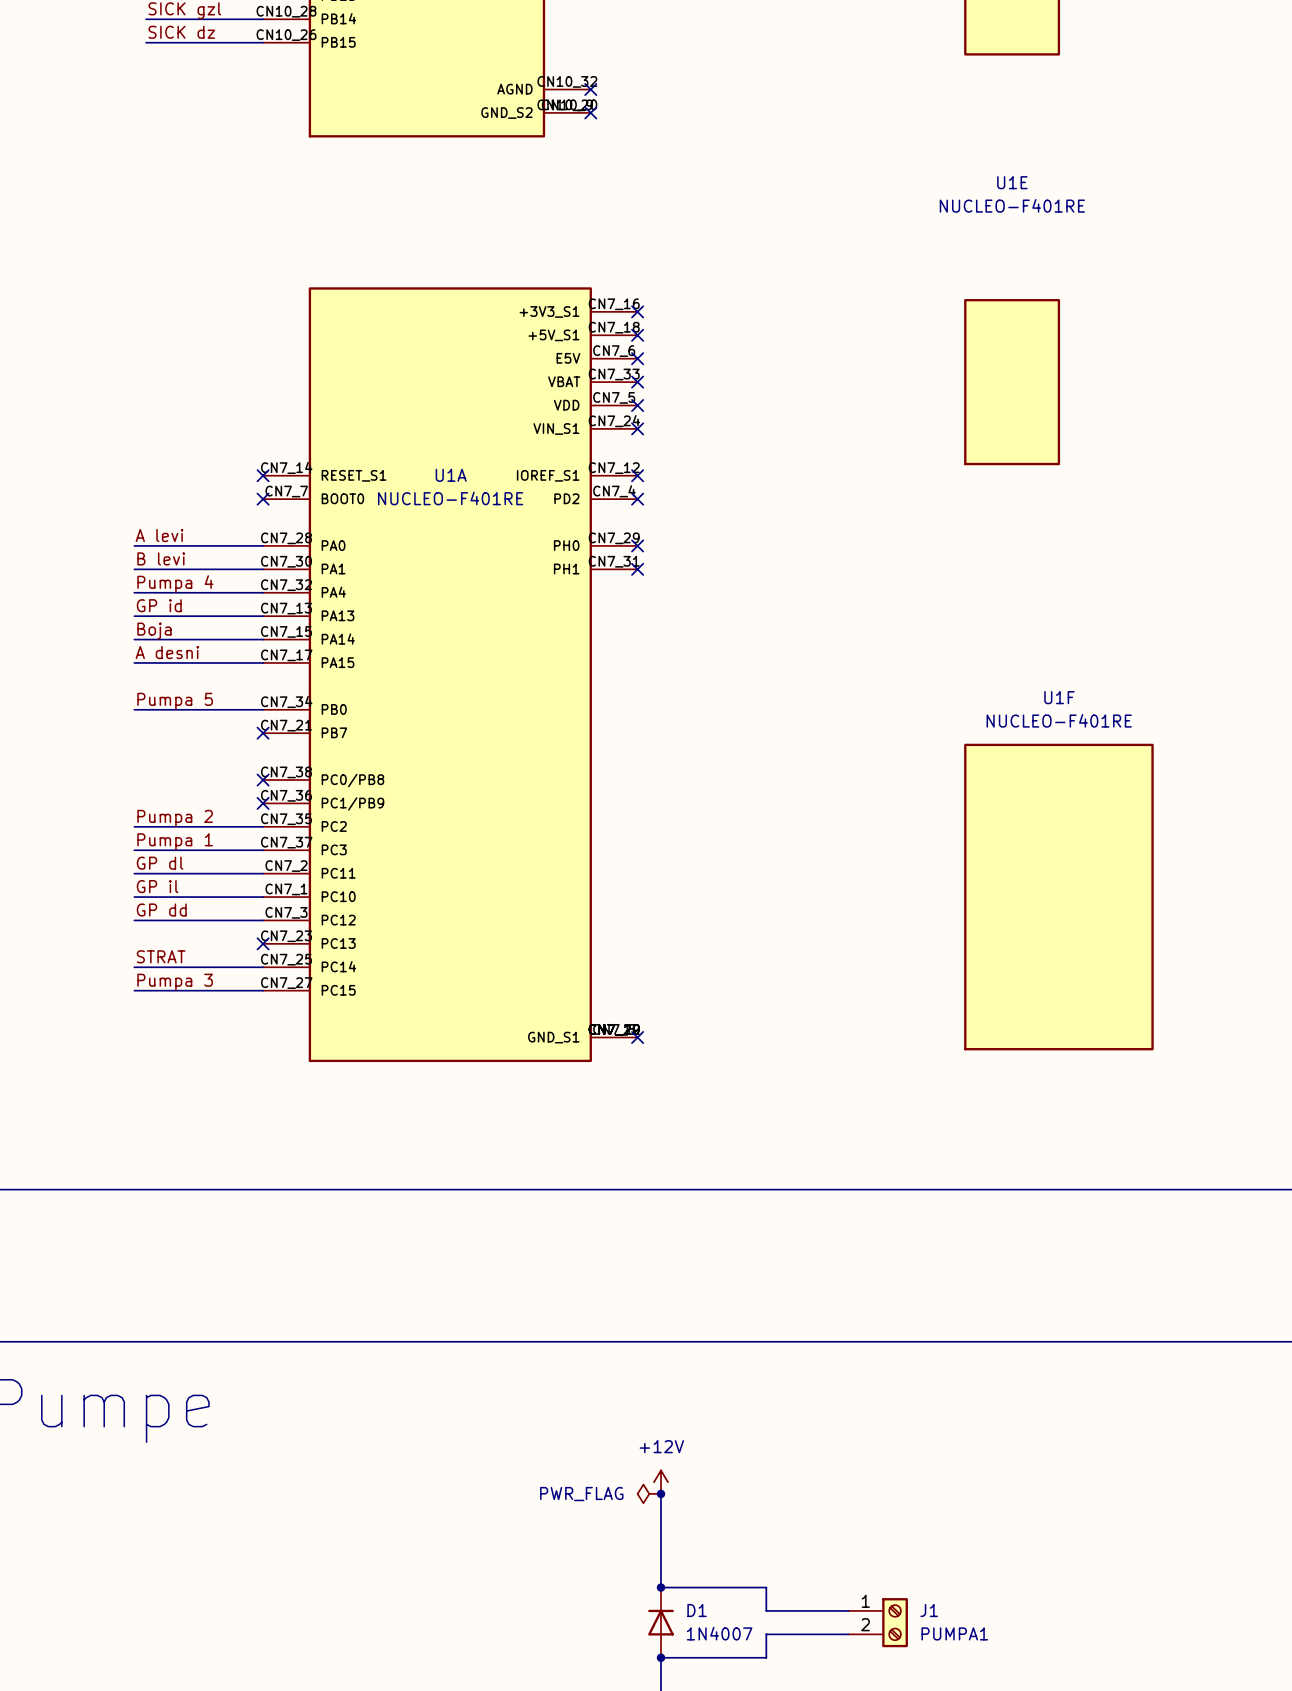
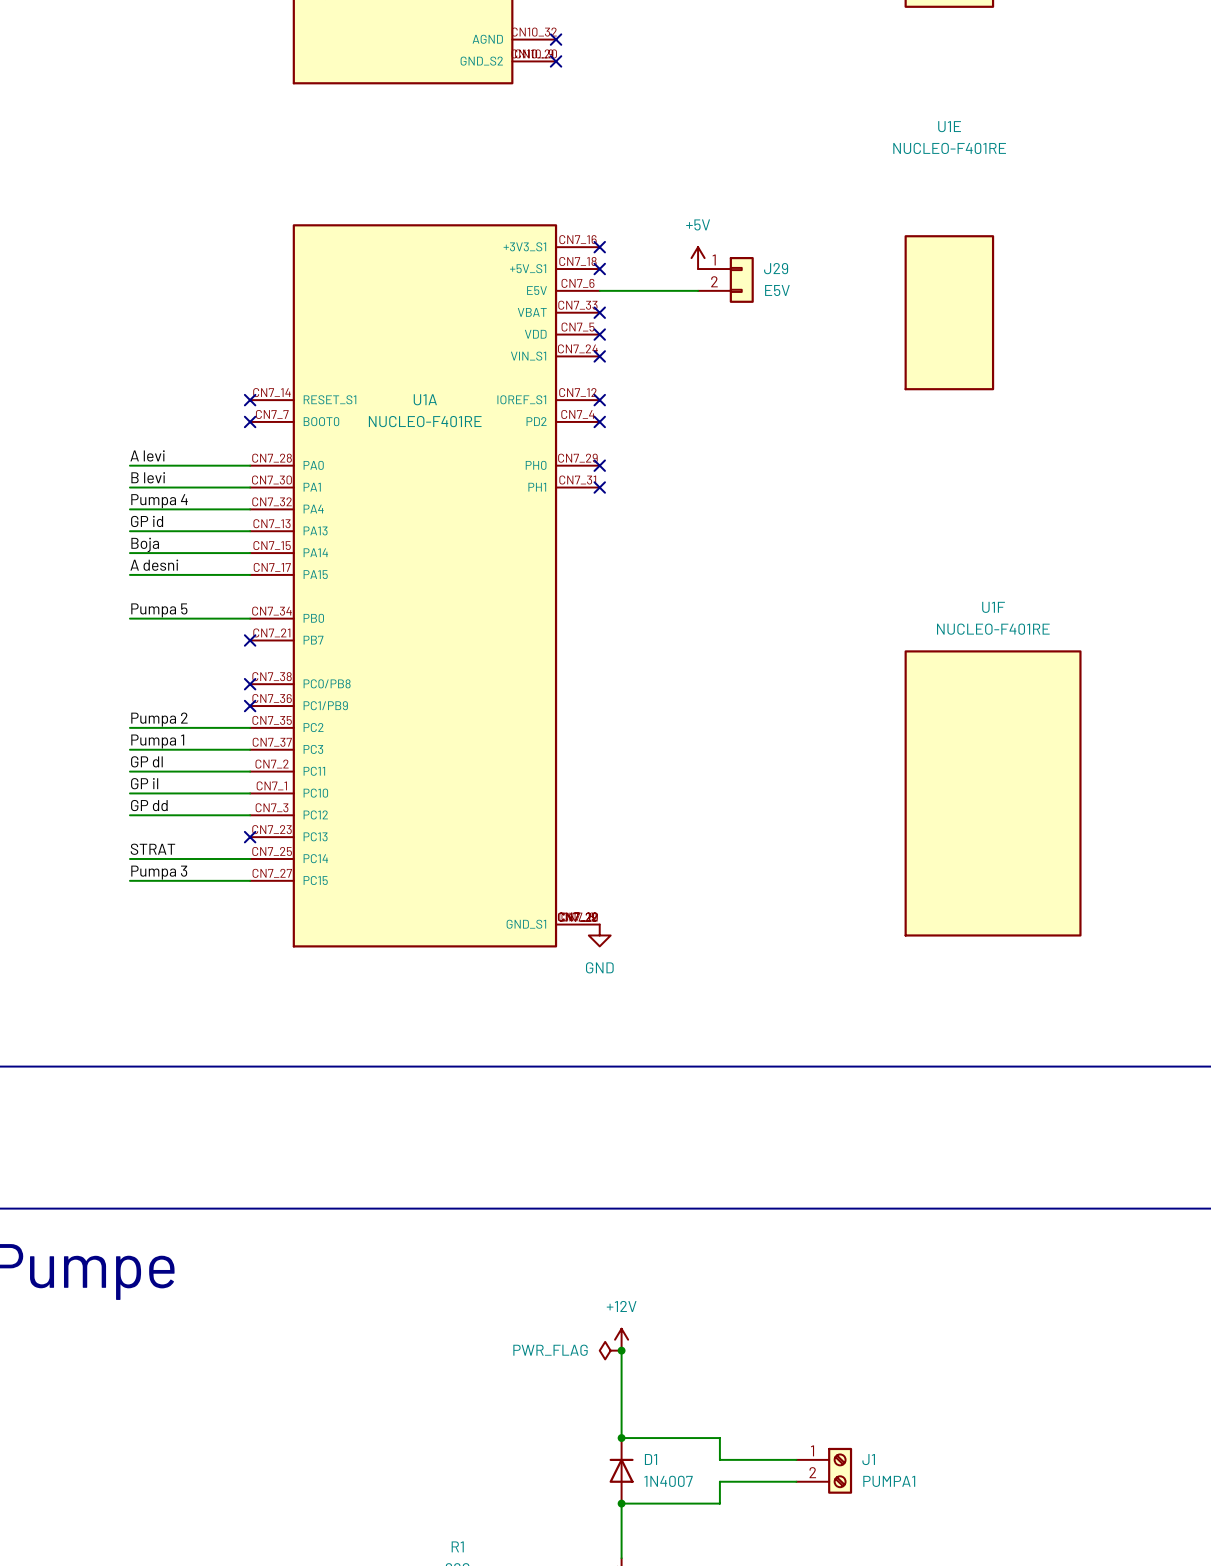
power symbol: none -> +5V (698, 258)
J29: none -> E5V (725, 279)
wire: none -> (599, 290) (698, 290)
no-connect mark: (637, 358) -> none
no-connect mark: (637, 1037) -> none
power symbol: none -> GND (599, 935)

